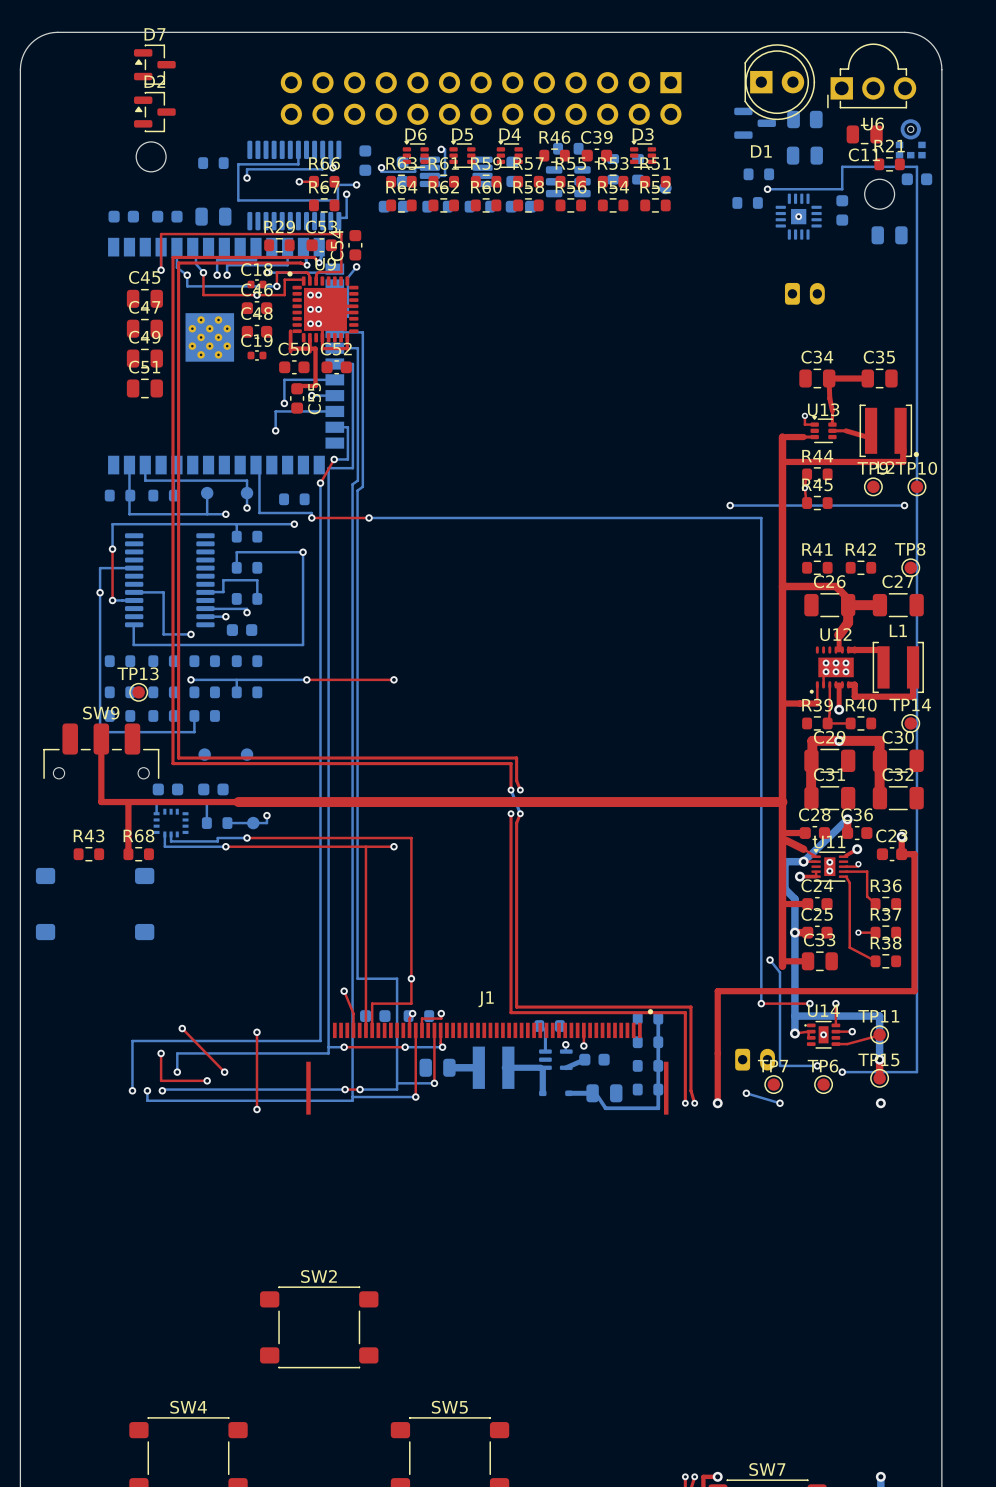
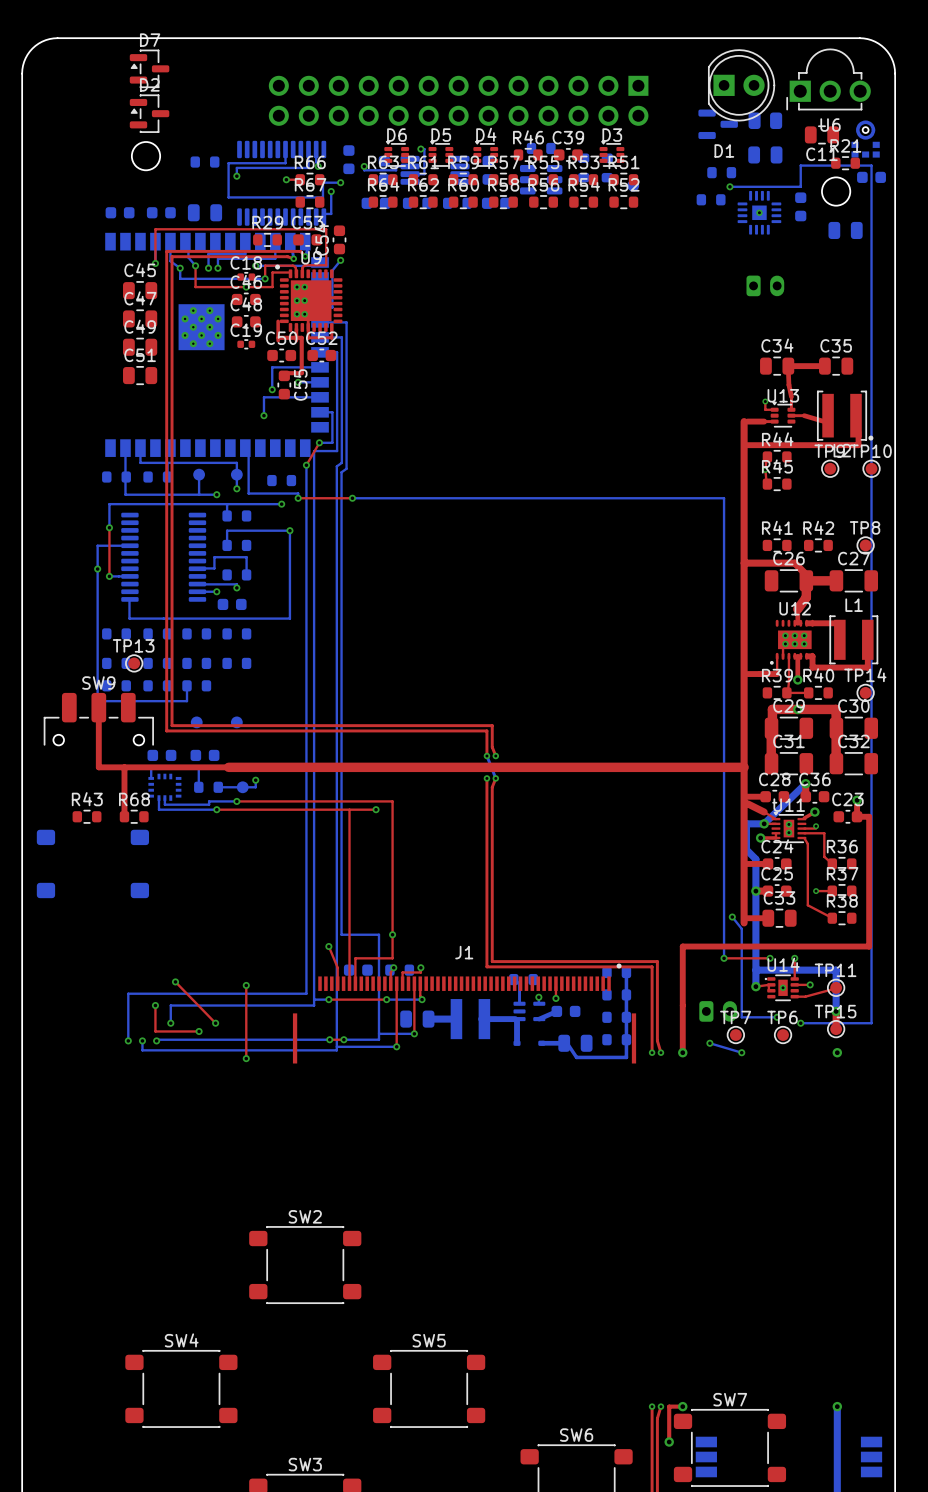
bottom track: (730, 505) (904, 505) -> none
via: (730, 505) -> none
via: (904, 505) -> none
bottom track: (141, 592) (163, 592) (163, 634) (190, 634) -> none
via: (190, 634) -> none
bottom track: (190, 679) (306, 679) -> none
via: (190, 679) -> none
bottom track: (236, 679) (236, 692) -> none
top track: (306, 679) (393, 679) -> none
via: (306, 679) -> none
via: (393, 679) -> none

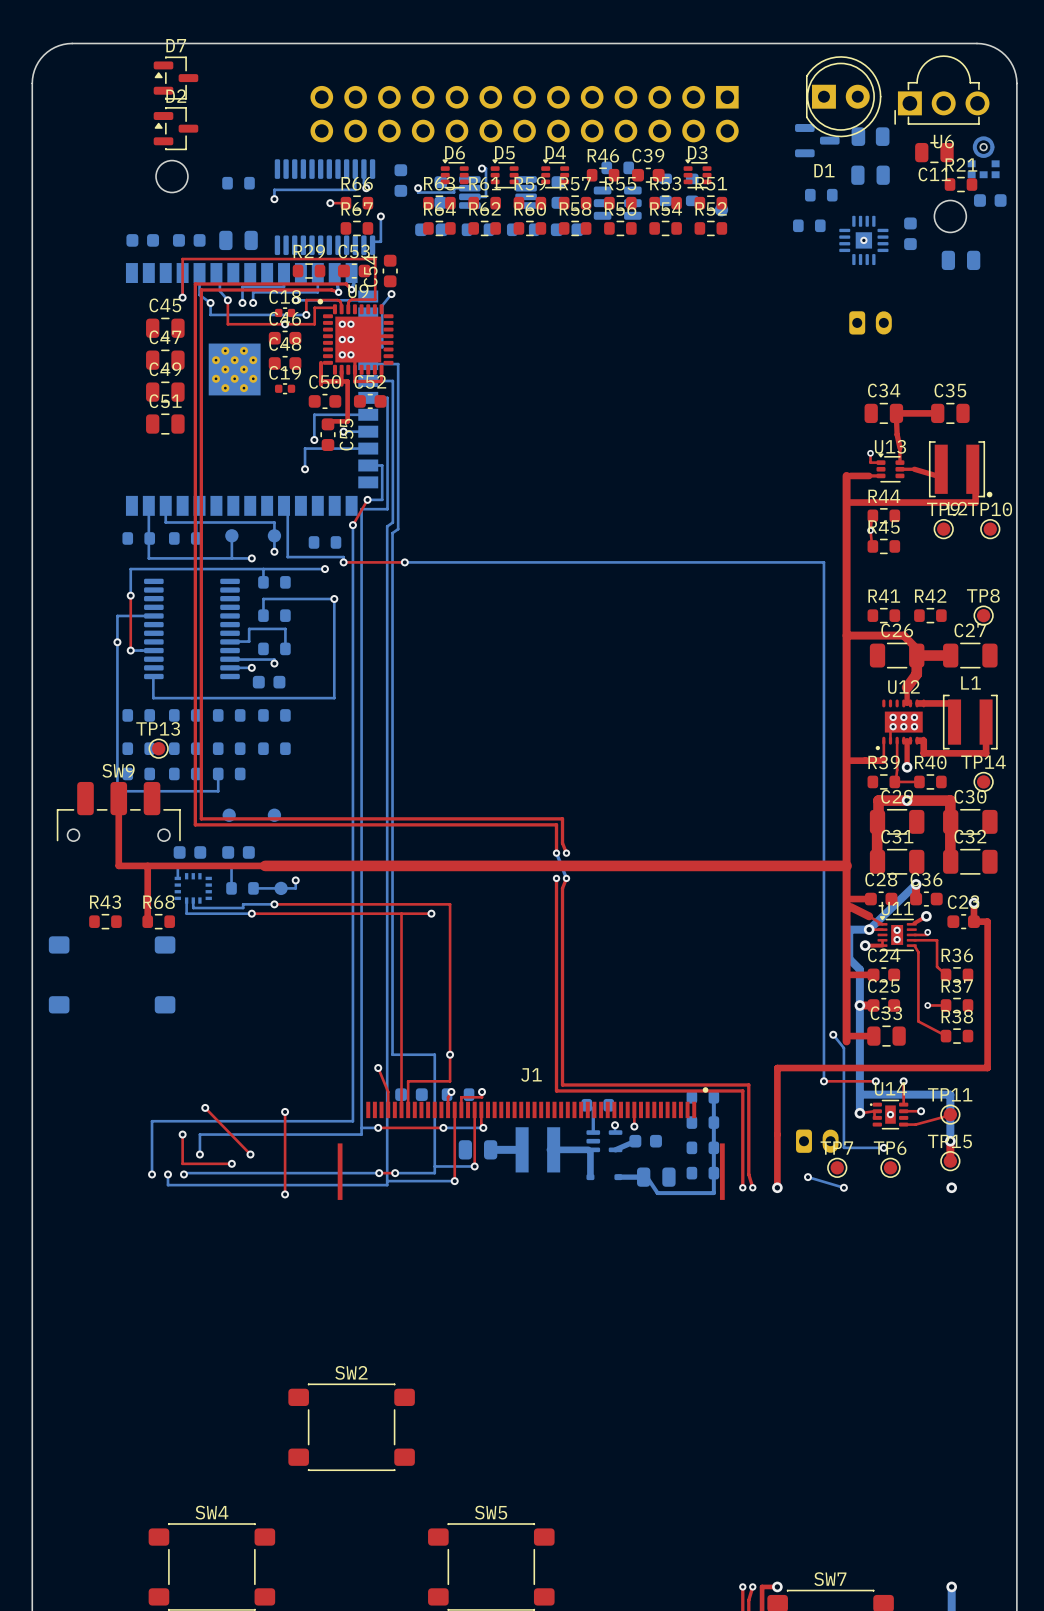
bottom track: (285, 151) (285, 163) (228, 163) (228, 197) (322, 197) (322, 182) (340, 182) -> none
via: (340, 182) -> none
bottom track: (729, 186) (800, 186) (800, 165) (871, 165) (871, 1023) (800, 1023) -> none
via: (729, 186) -> none
via: (800, 1023) -> none

